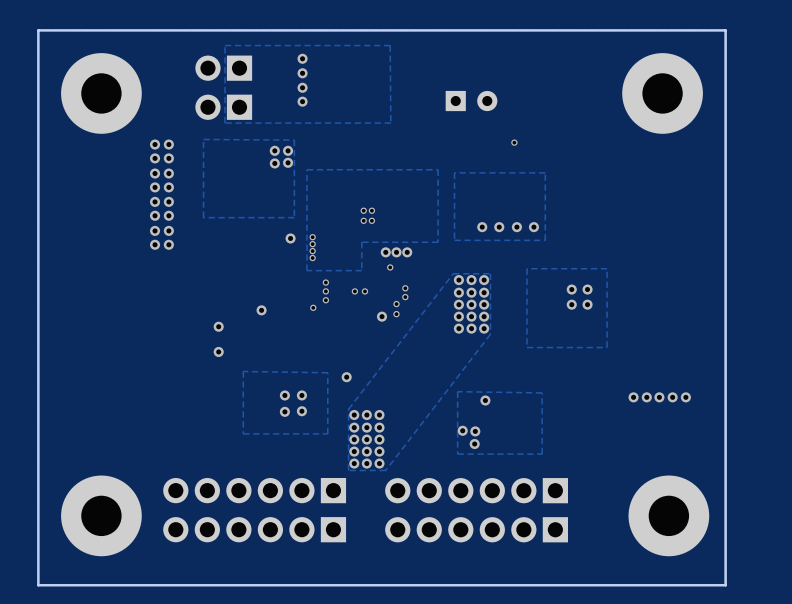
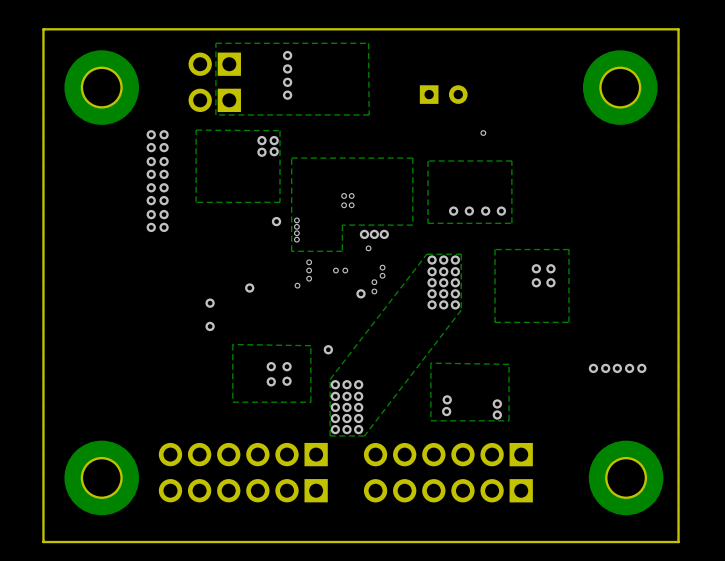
via: (485, 400) -> none
via: (462, 430) -> none
via: none -> (497, 403)
via: none -> (497, 415)

